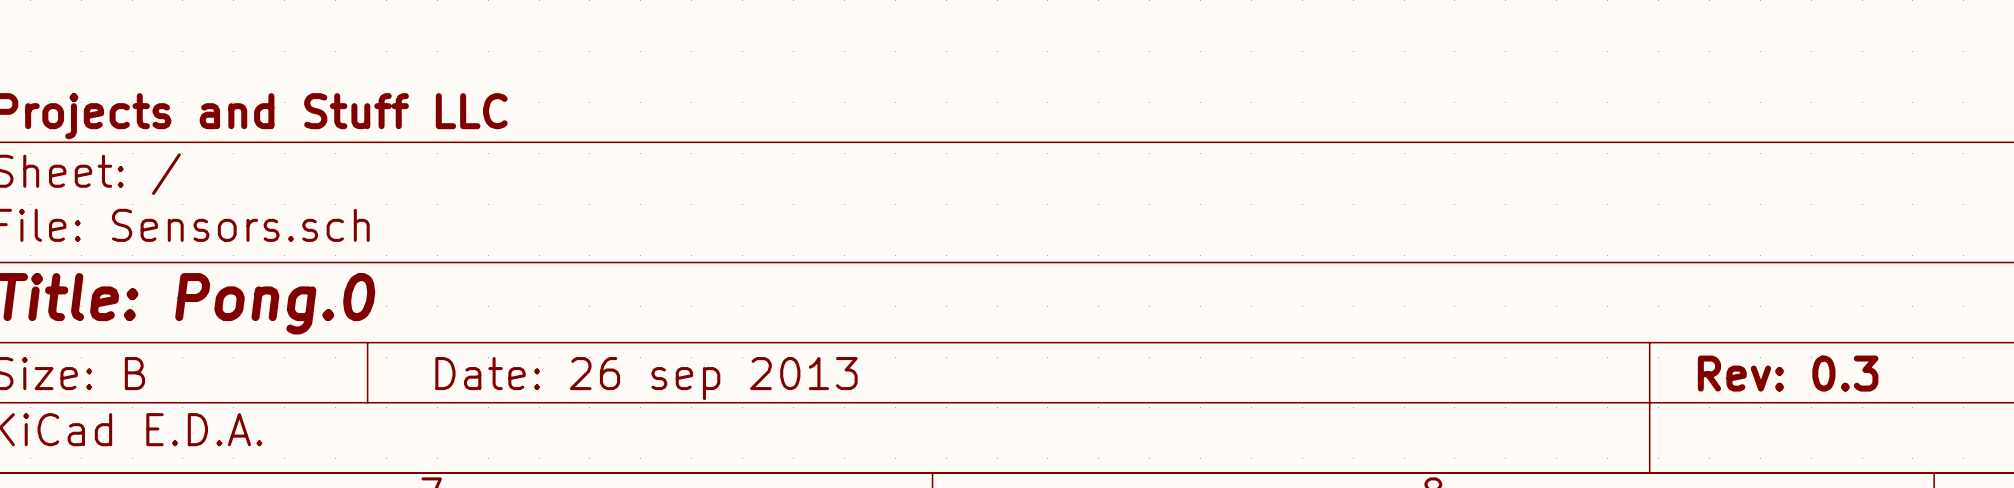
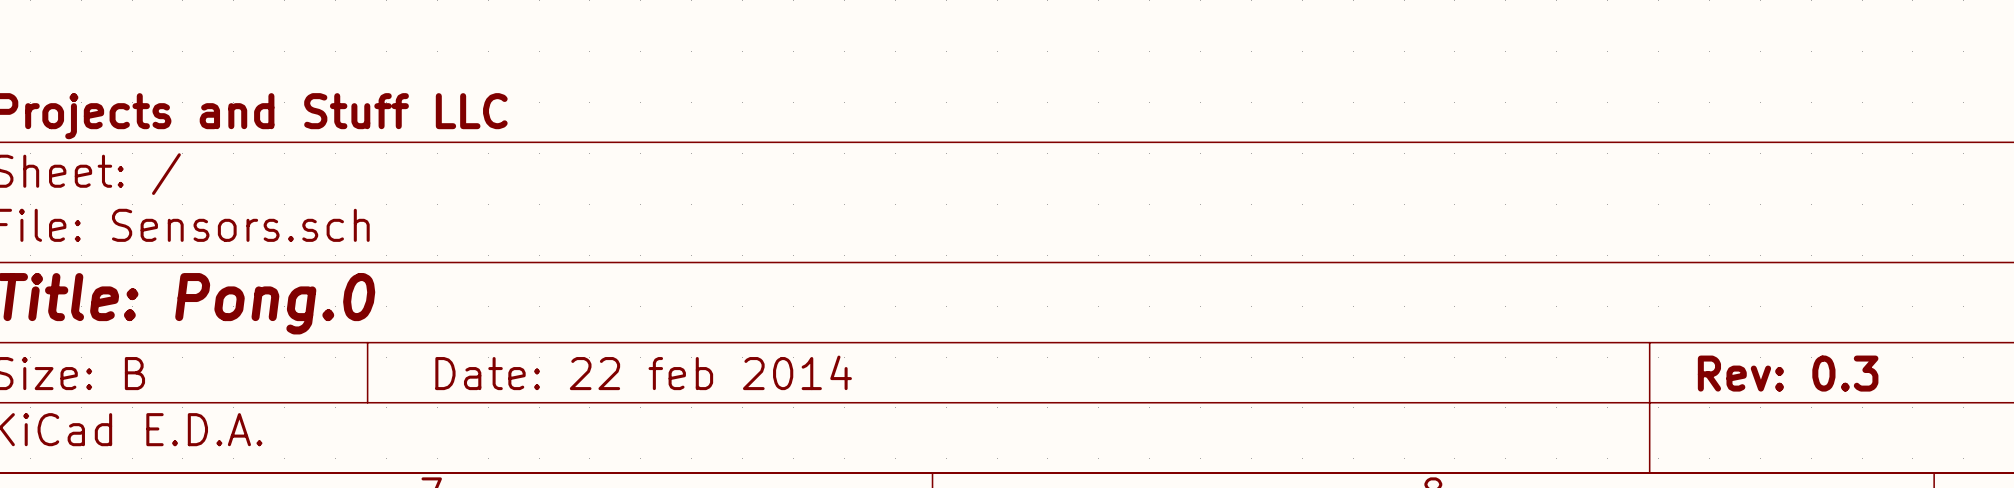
title block: Date: 26 sep 2013 (646, 378) -> Date: 22 feb 2014 (643, 372)

